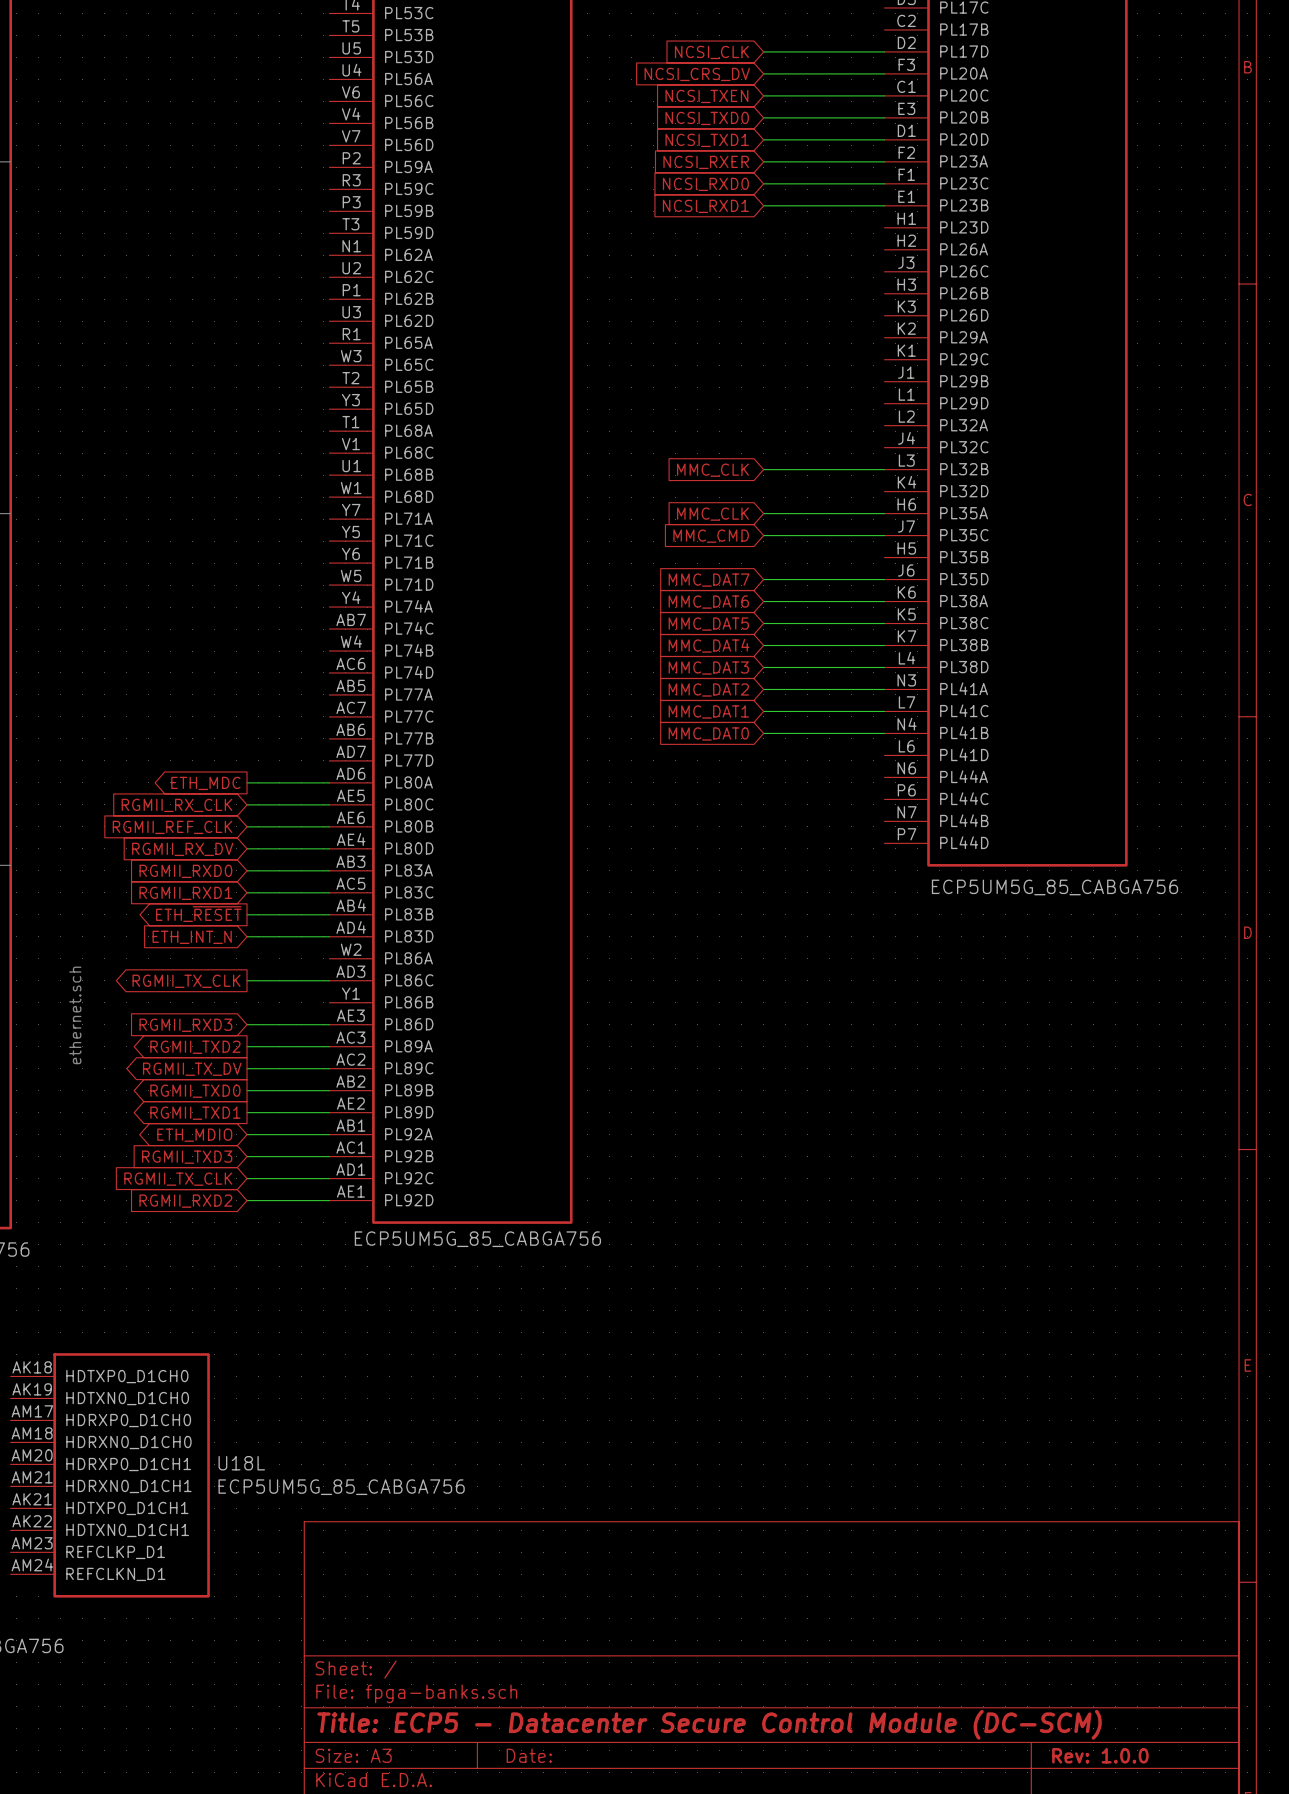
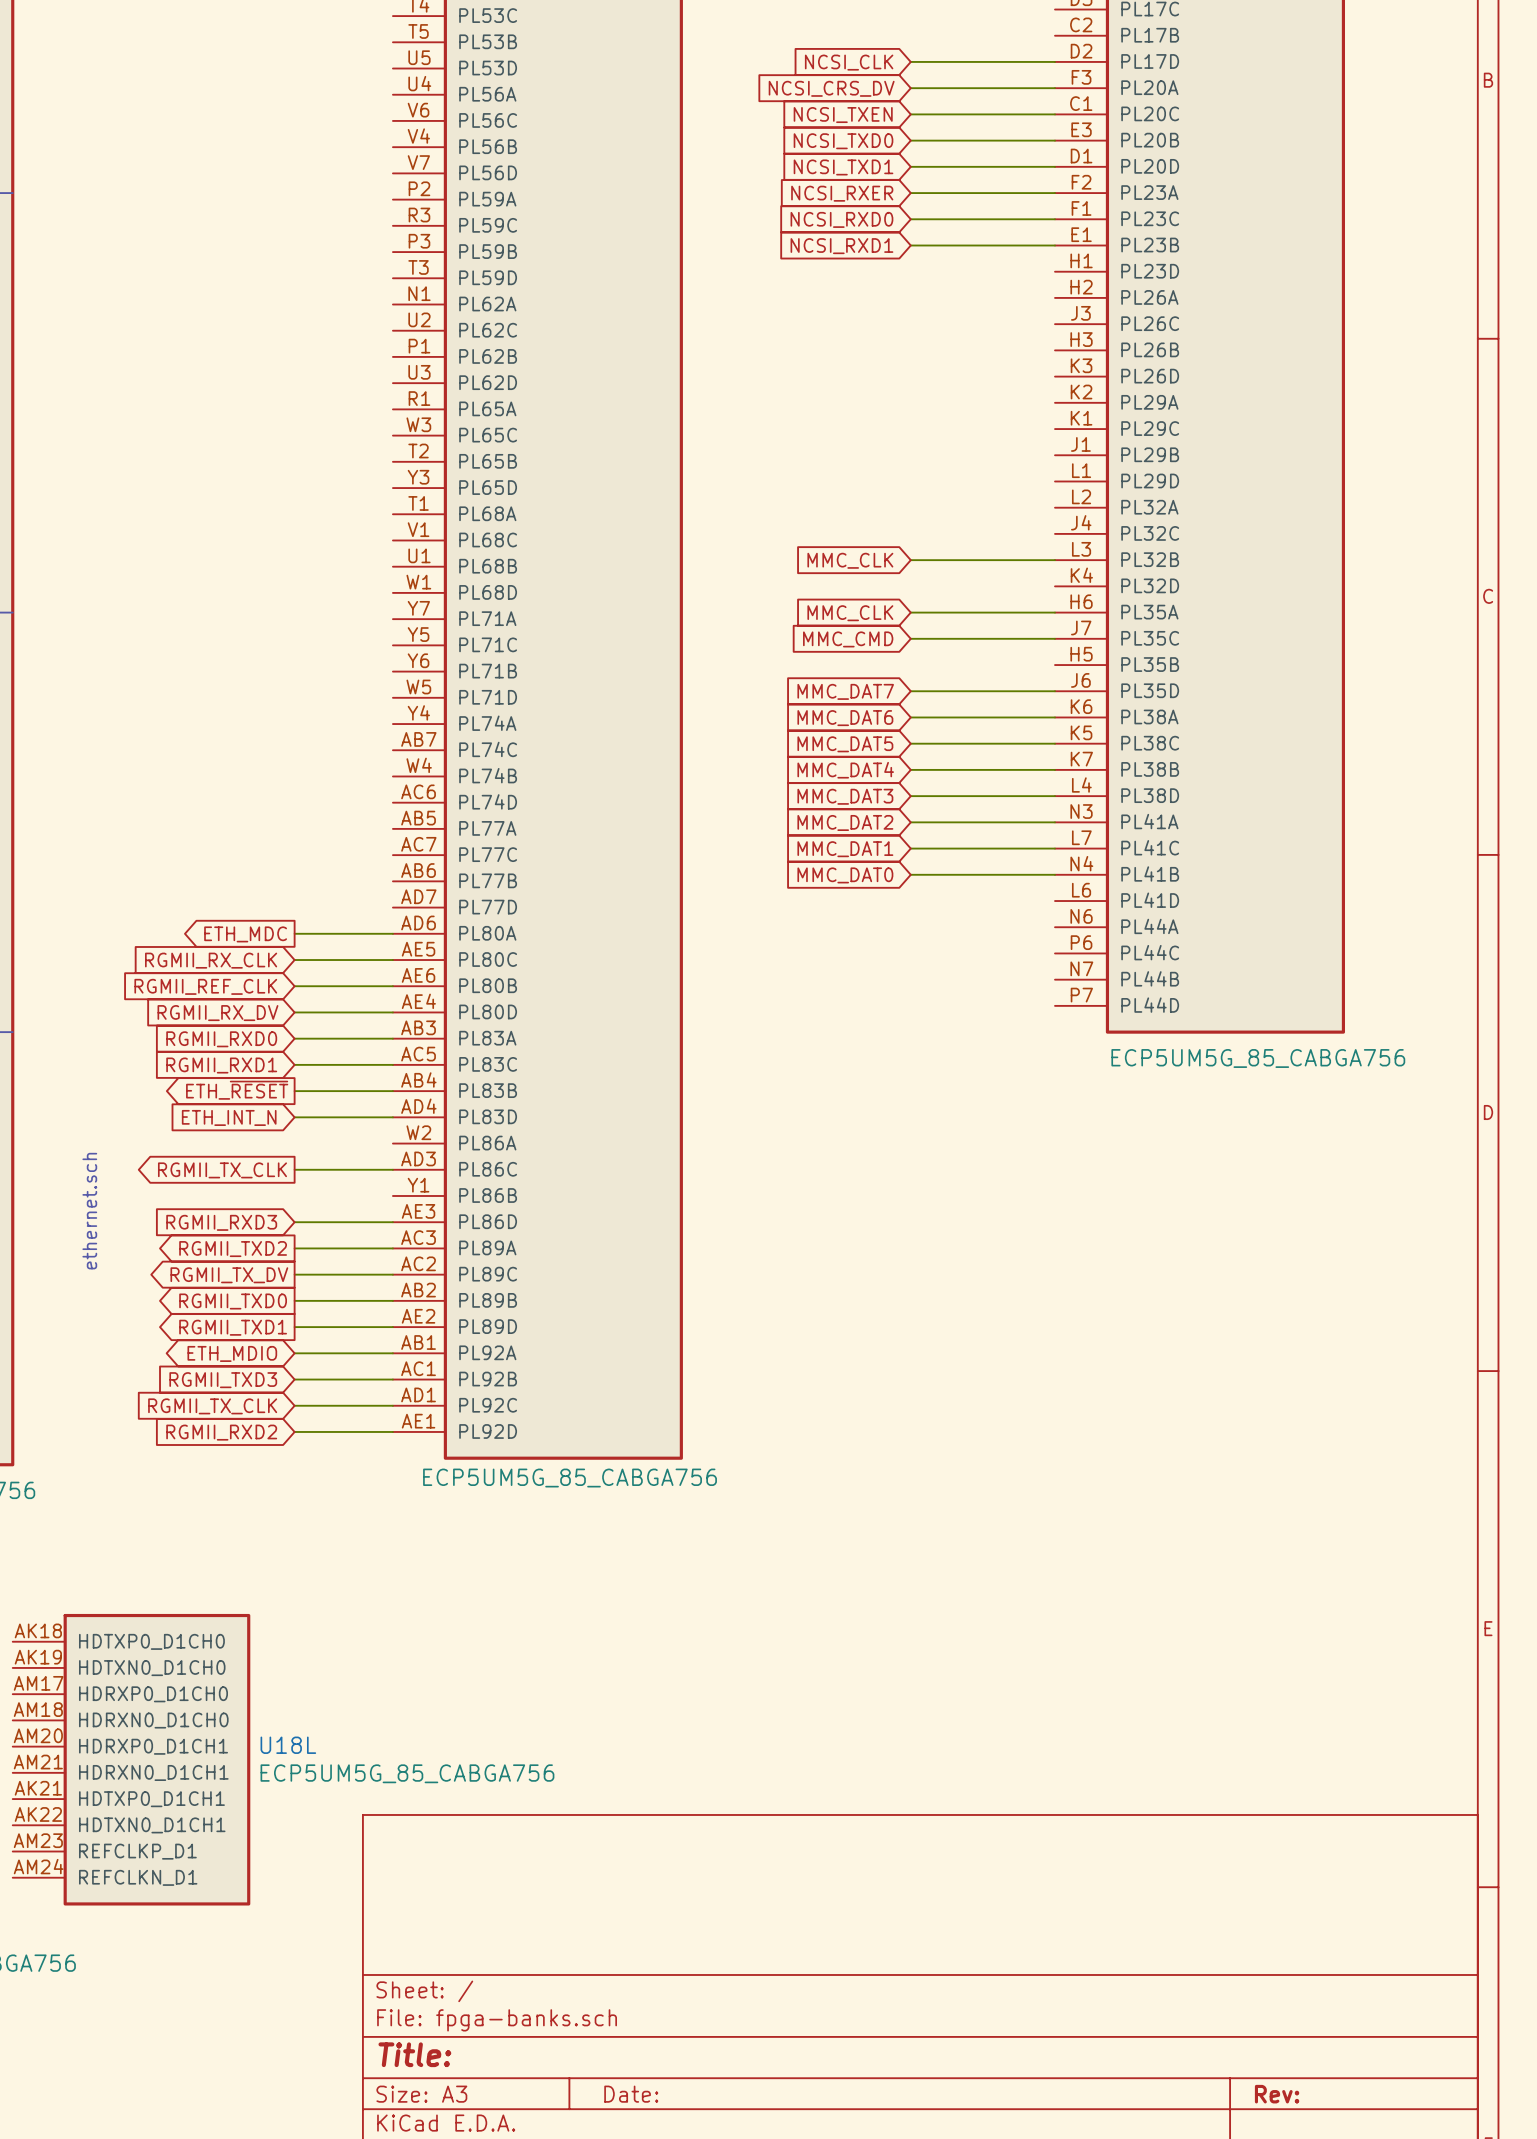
title block: Title: ECP5 - Datacenter Secure Control Module (DC-SCM) (709, 1724) -> Title: (414, 2054)
title block: Rev: 1.0.0 (1100, 1755) -> Rev: (1277, 2094)

